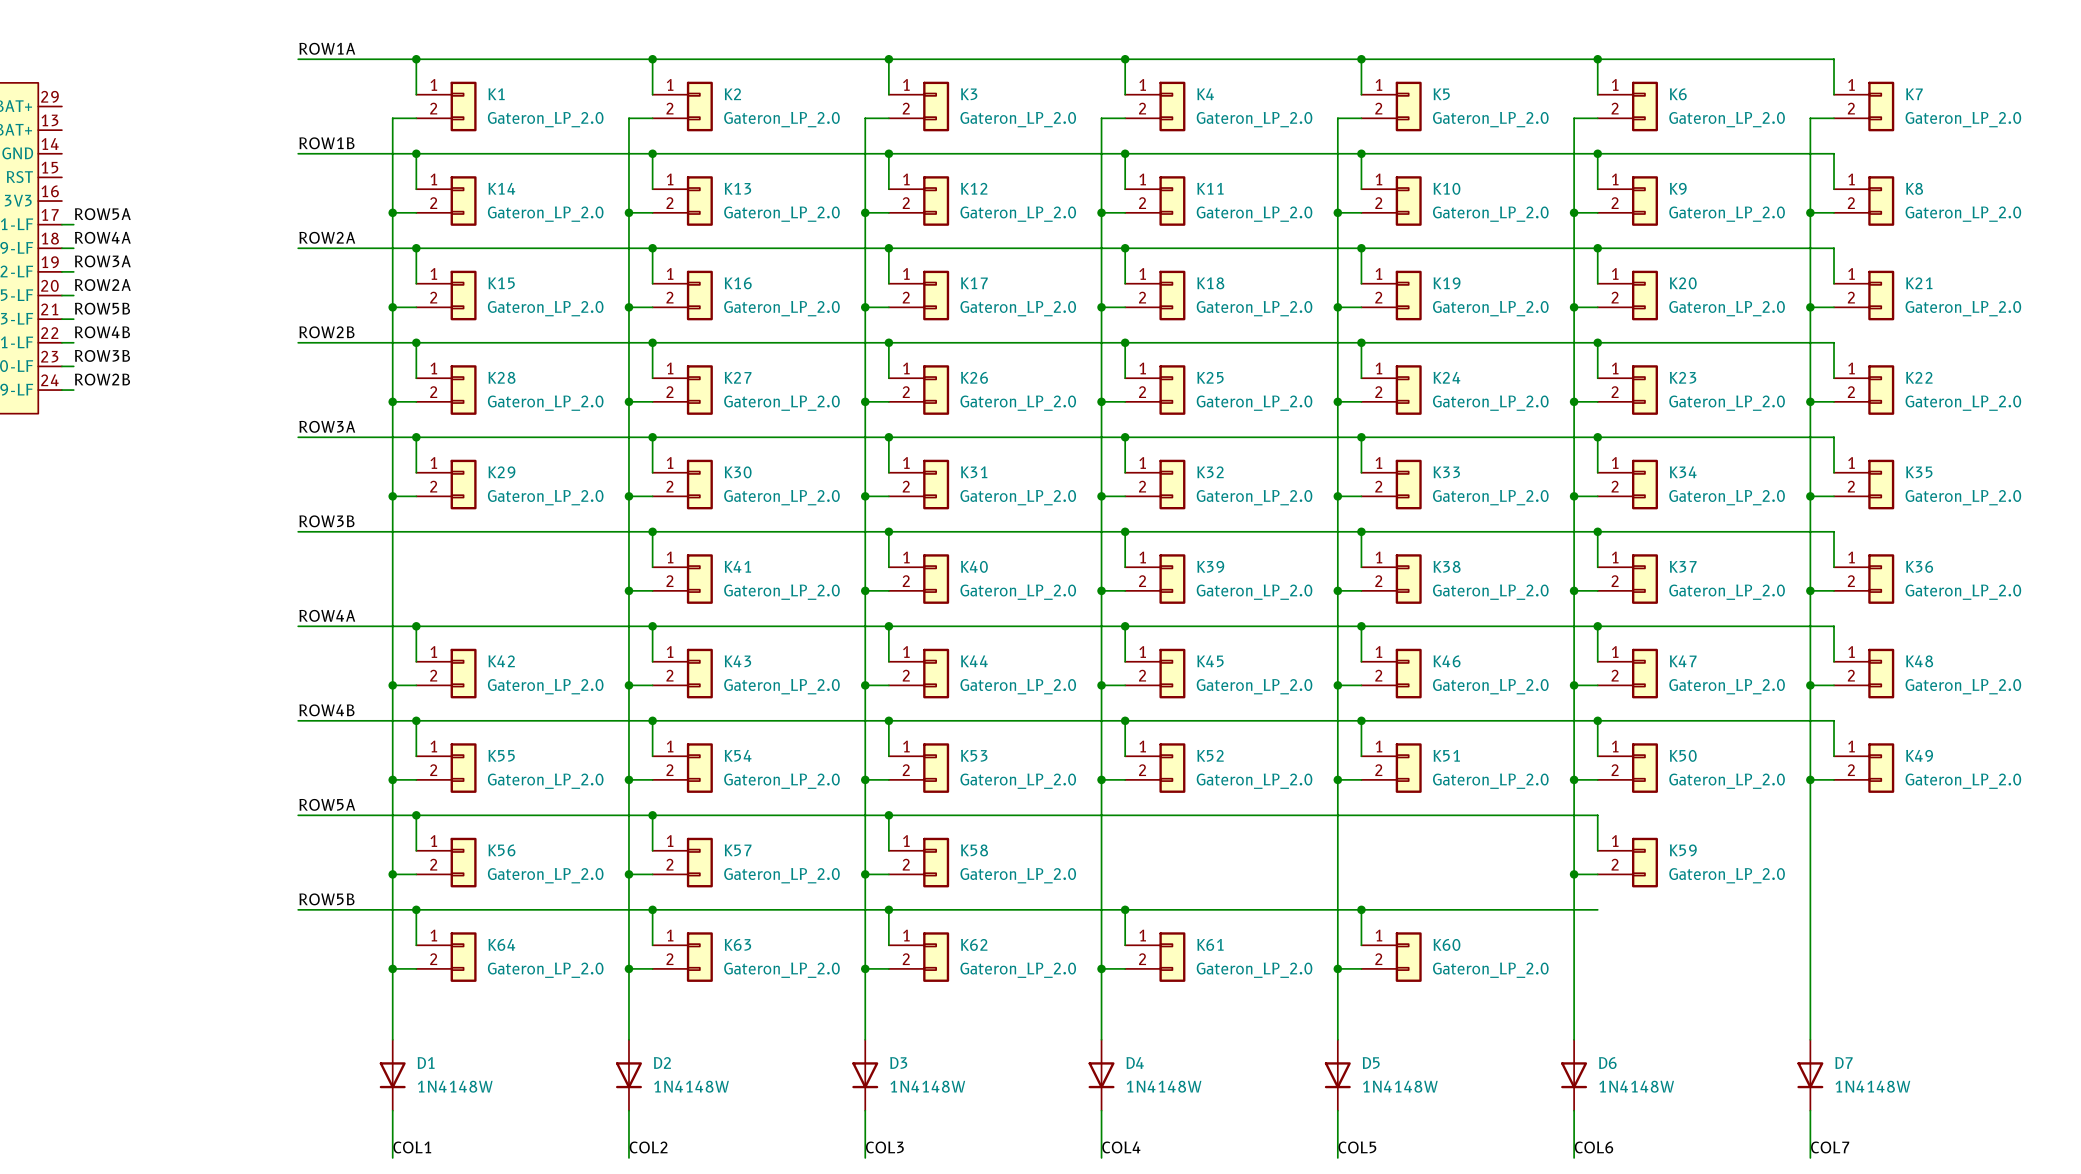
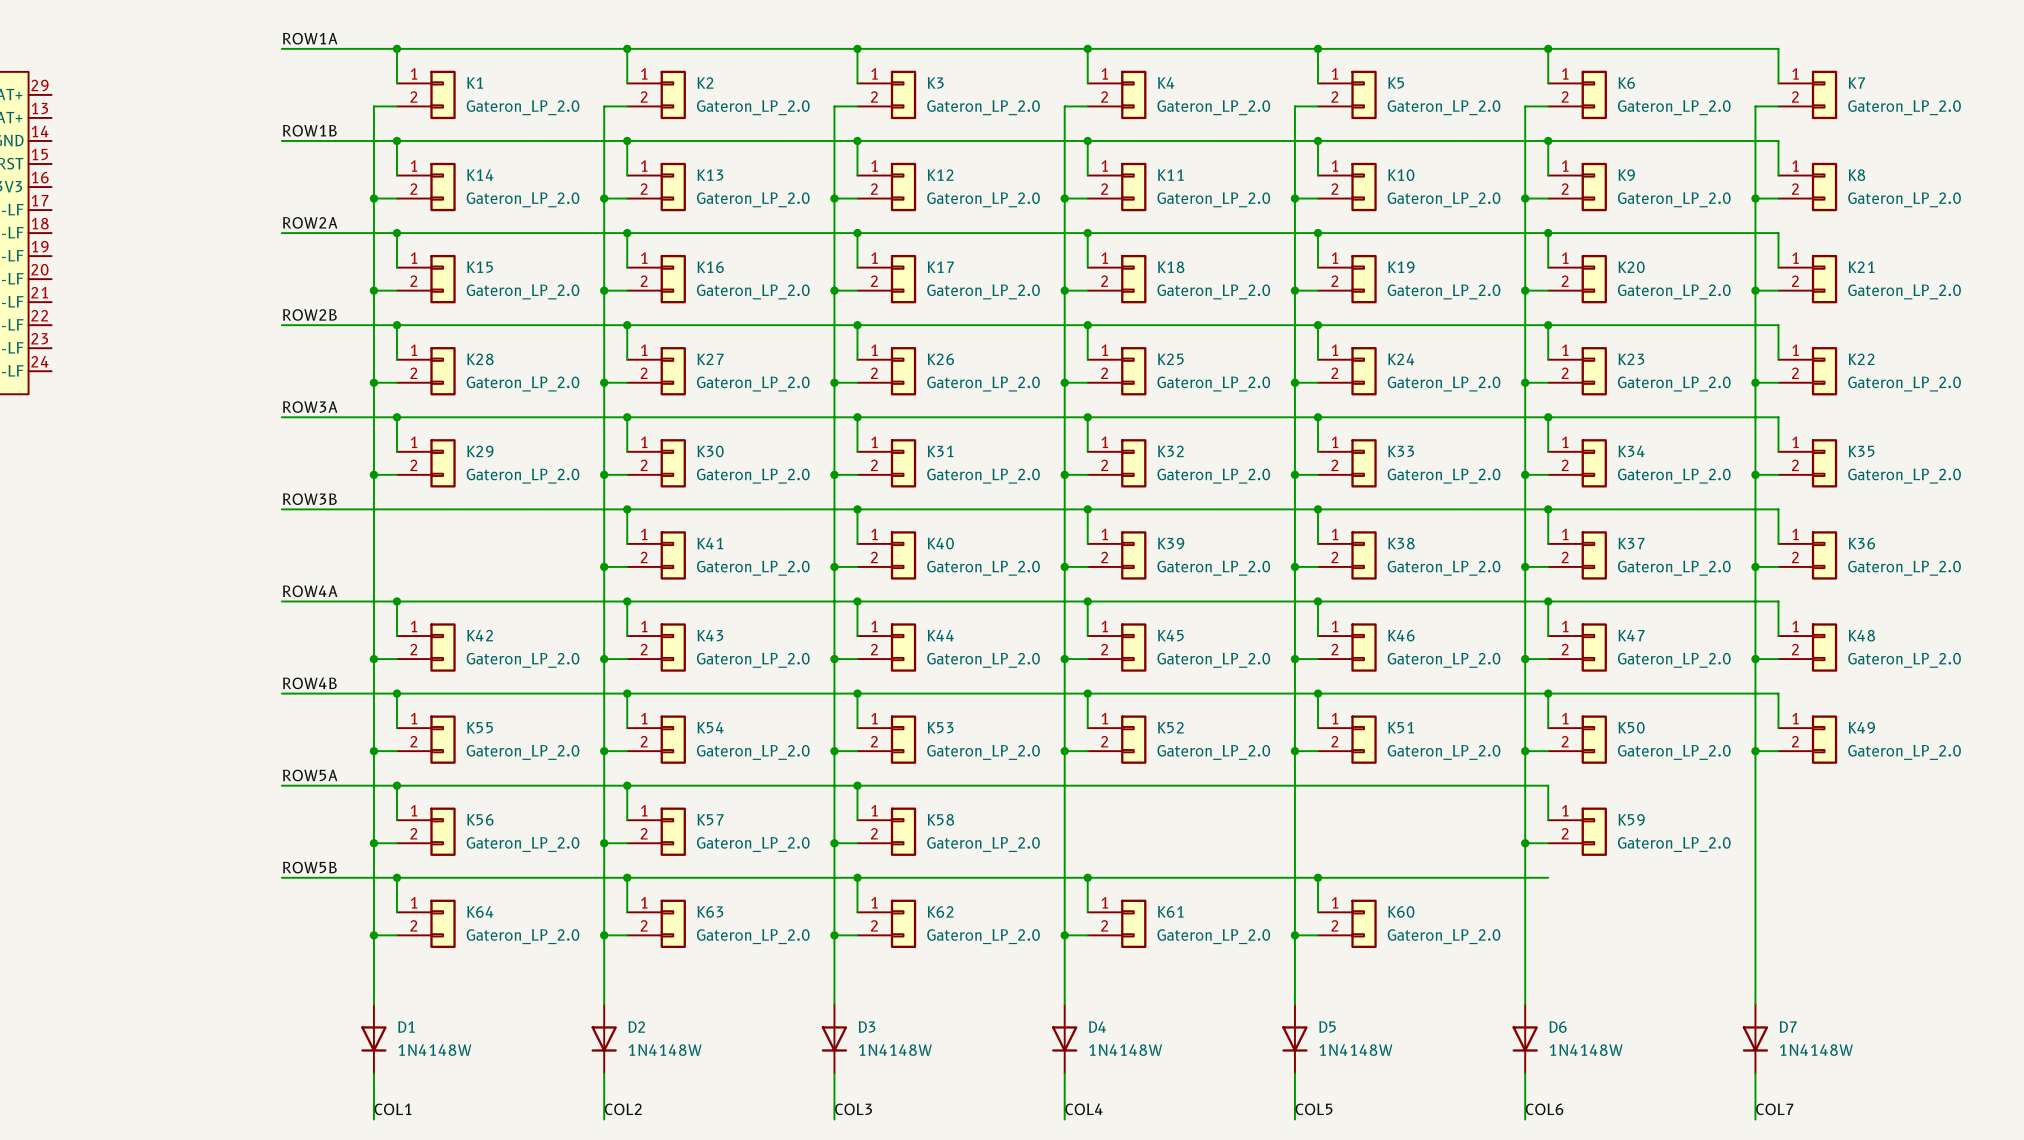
label: ROW5A (102, 214) -> none
wire: (61, 224) (73, 224) -> none
label: ROW4A (102, 237) -> none
wire: (61, 248) (73, 248) -> none
label: ROW3A (102, 261) -> none
wire: (61, 271) (73, 271) -> none
label: ROW2A (102, 285) -> none
wire: (61, 295) (73, 295) -> none
label: ROW5B (102, 308) -> none
wire: (61, 319) (73, 319) -> none
label: ROW4B (102, 332) -> none
wire: (61, 342) (73, 342) -> none
label: ROW3B (102, 355) -> none
wire: (61, 366) (73, 366) -> none
label: ROW2B (102, 379) -> none
wire: (61, 390) (73, 390) -> none

